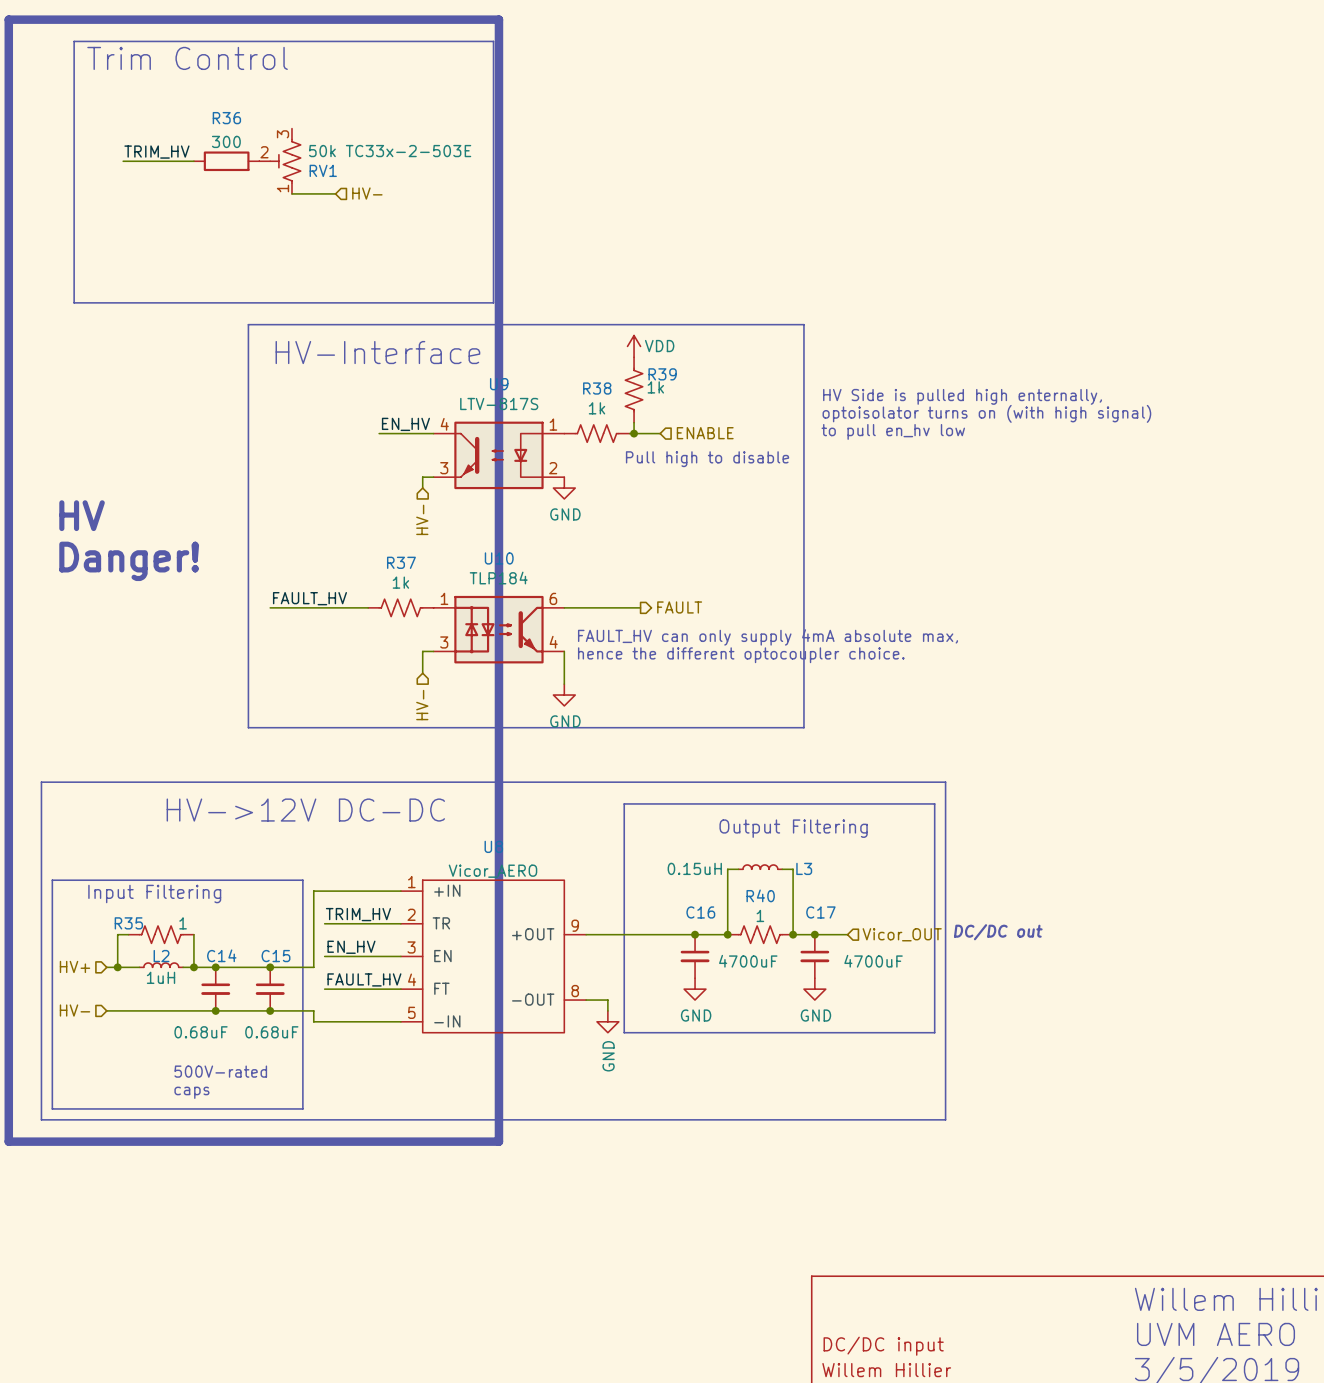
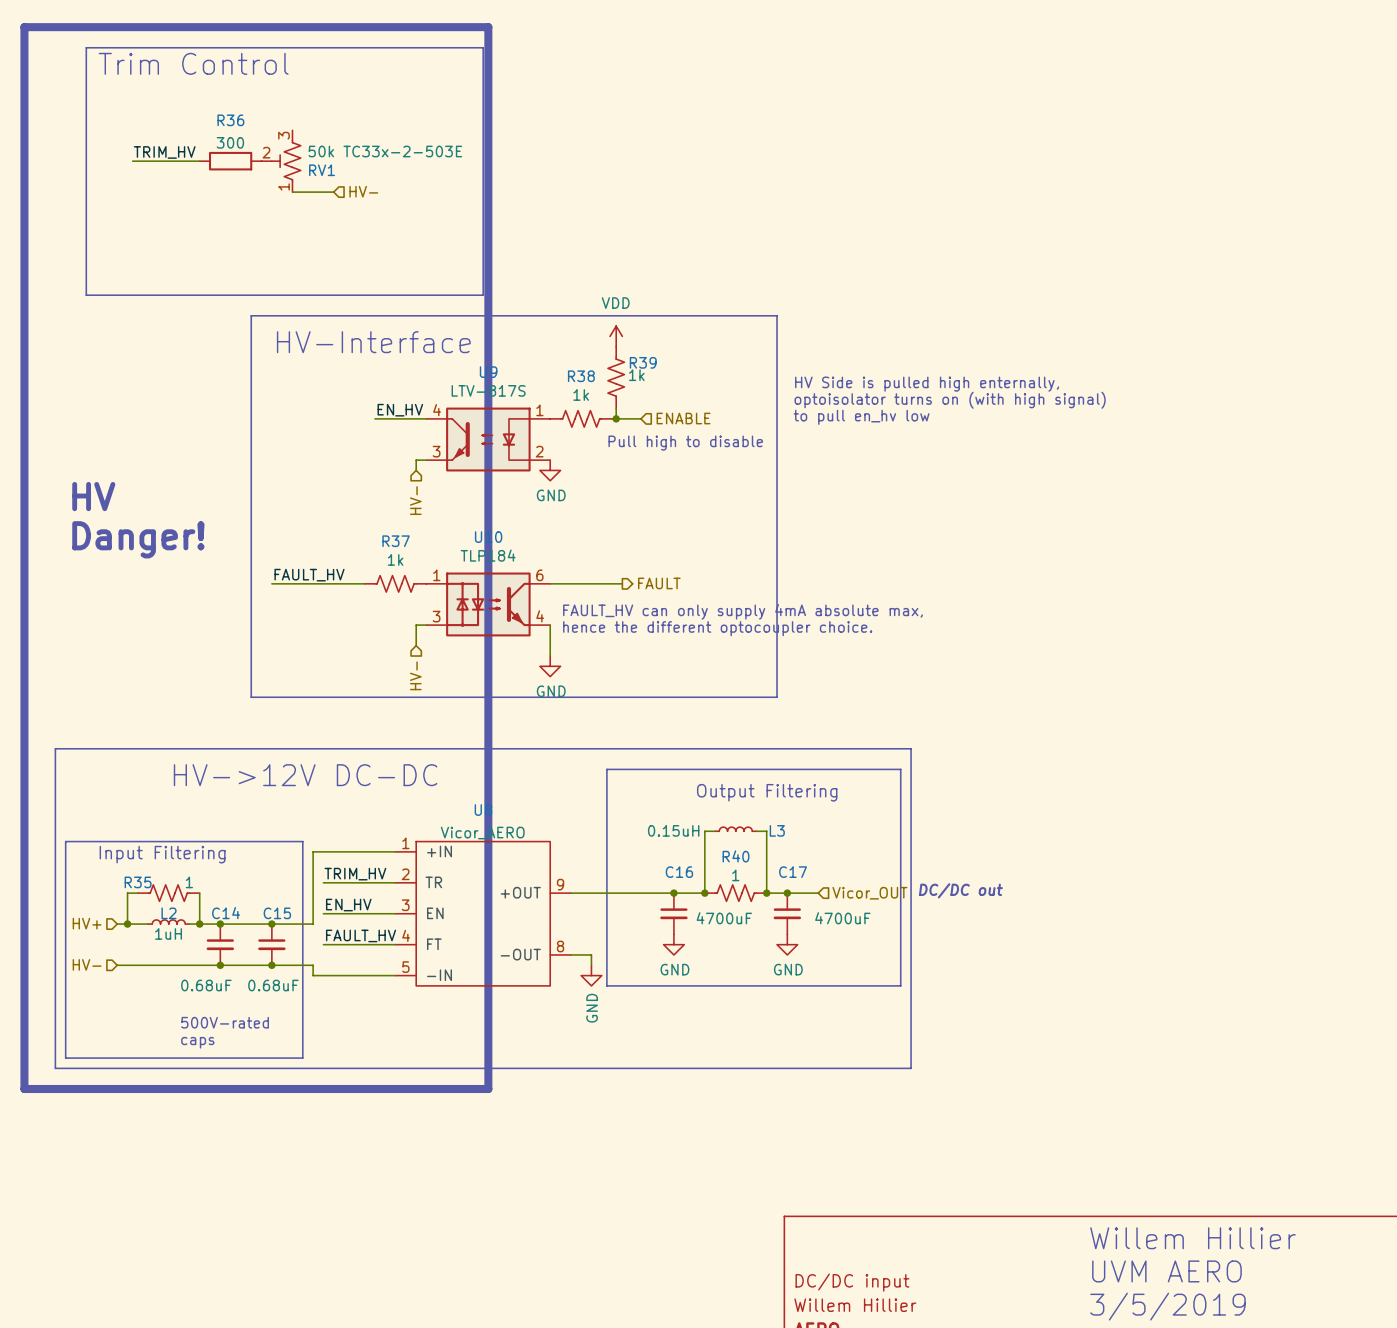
power symbol text position: VDD (659, 346) -> VDD (615, 303)

